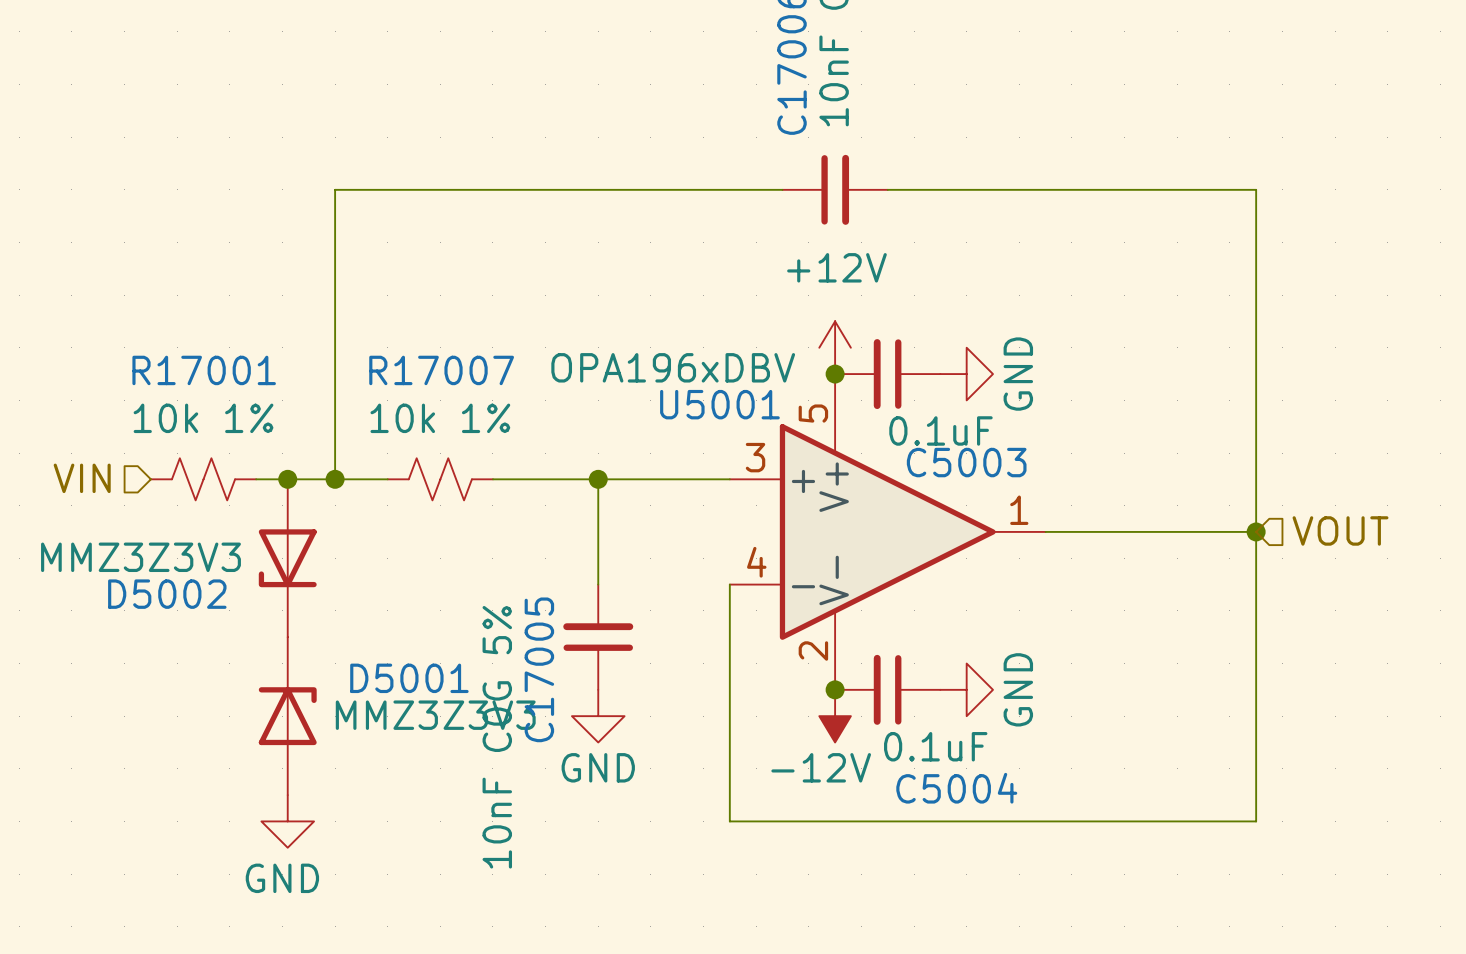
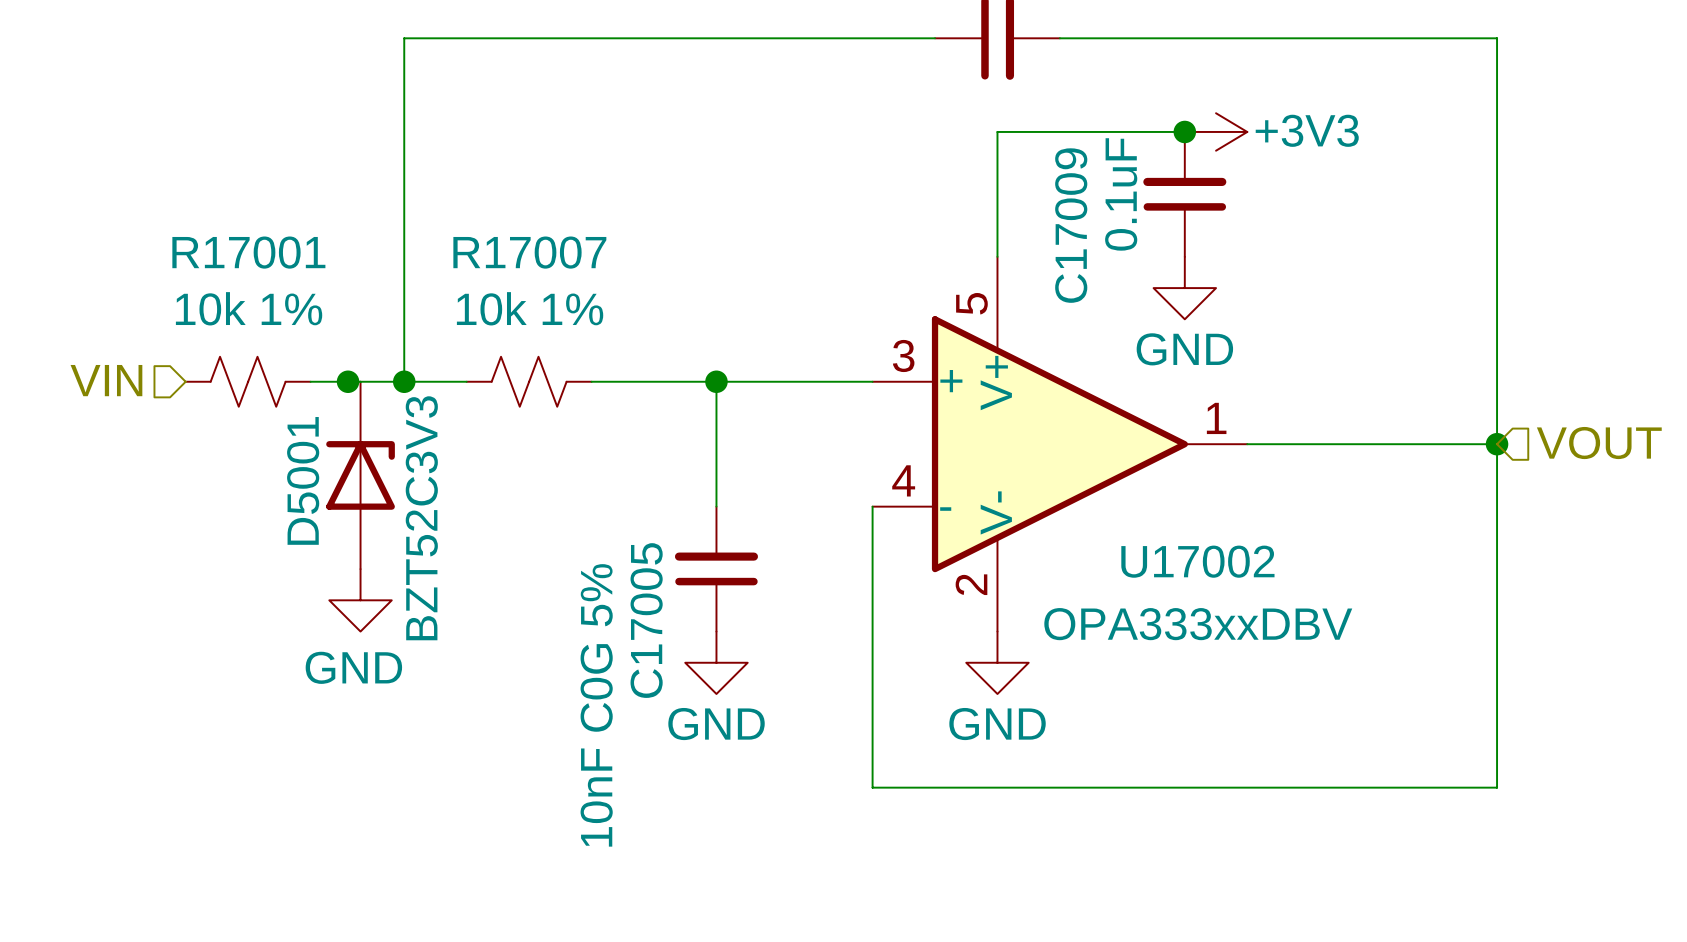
wire: none -> (1184, 131) (997, 131) (997, 256)
junction: none -> (1184, 131)
power symbol: none -> +3V3 (1216, 131)
C17009: none -> 0.1uF (1184, 194)
power symbol: +12V (835, 347) -> none
U5001 value: OPA196xDBV (673, 367) -> OPA333xxDBV (1198, 624)
junction: (835, 374) -> none
C5003: 0.1uF (887, 374) -> none
power symbol rotation: 0° (966, 374) -> 90° clockwise (1184, 288)
power symbol position: GND (966, 374) -> GND (1184, 288)
U5001 name: U5001 (719, 404) -> U17002 (1197, 561)
D5002: MMZ3Z3V3 (287, 558) -> none
D5001 name rotation: 0° (409, 678) -> 90° counterclockwise (303, 480)
D5001 name position: D5001 (409, 678) -> D5001 (303, 480)
junction: (835, 689) -> none
C5004: 0.1uF (887, 689) -> none
power symbol: GND (966, 689) -> none
D5001 value: MMZ3Z3V3 (435, 715) -> BZT52C3V3 (421, 518)
D5001 position: (287, 716) -> (360, 475)
power symbol: -12V (835, 716) -> GND (997, 662)
power symbol position: GND (287, 821) -> GND (360, 600)

